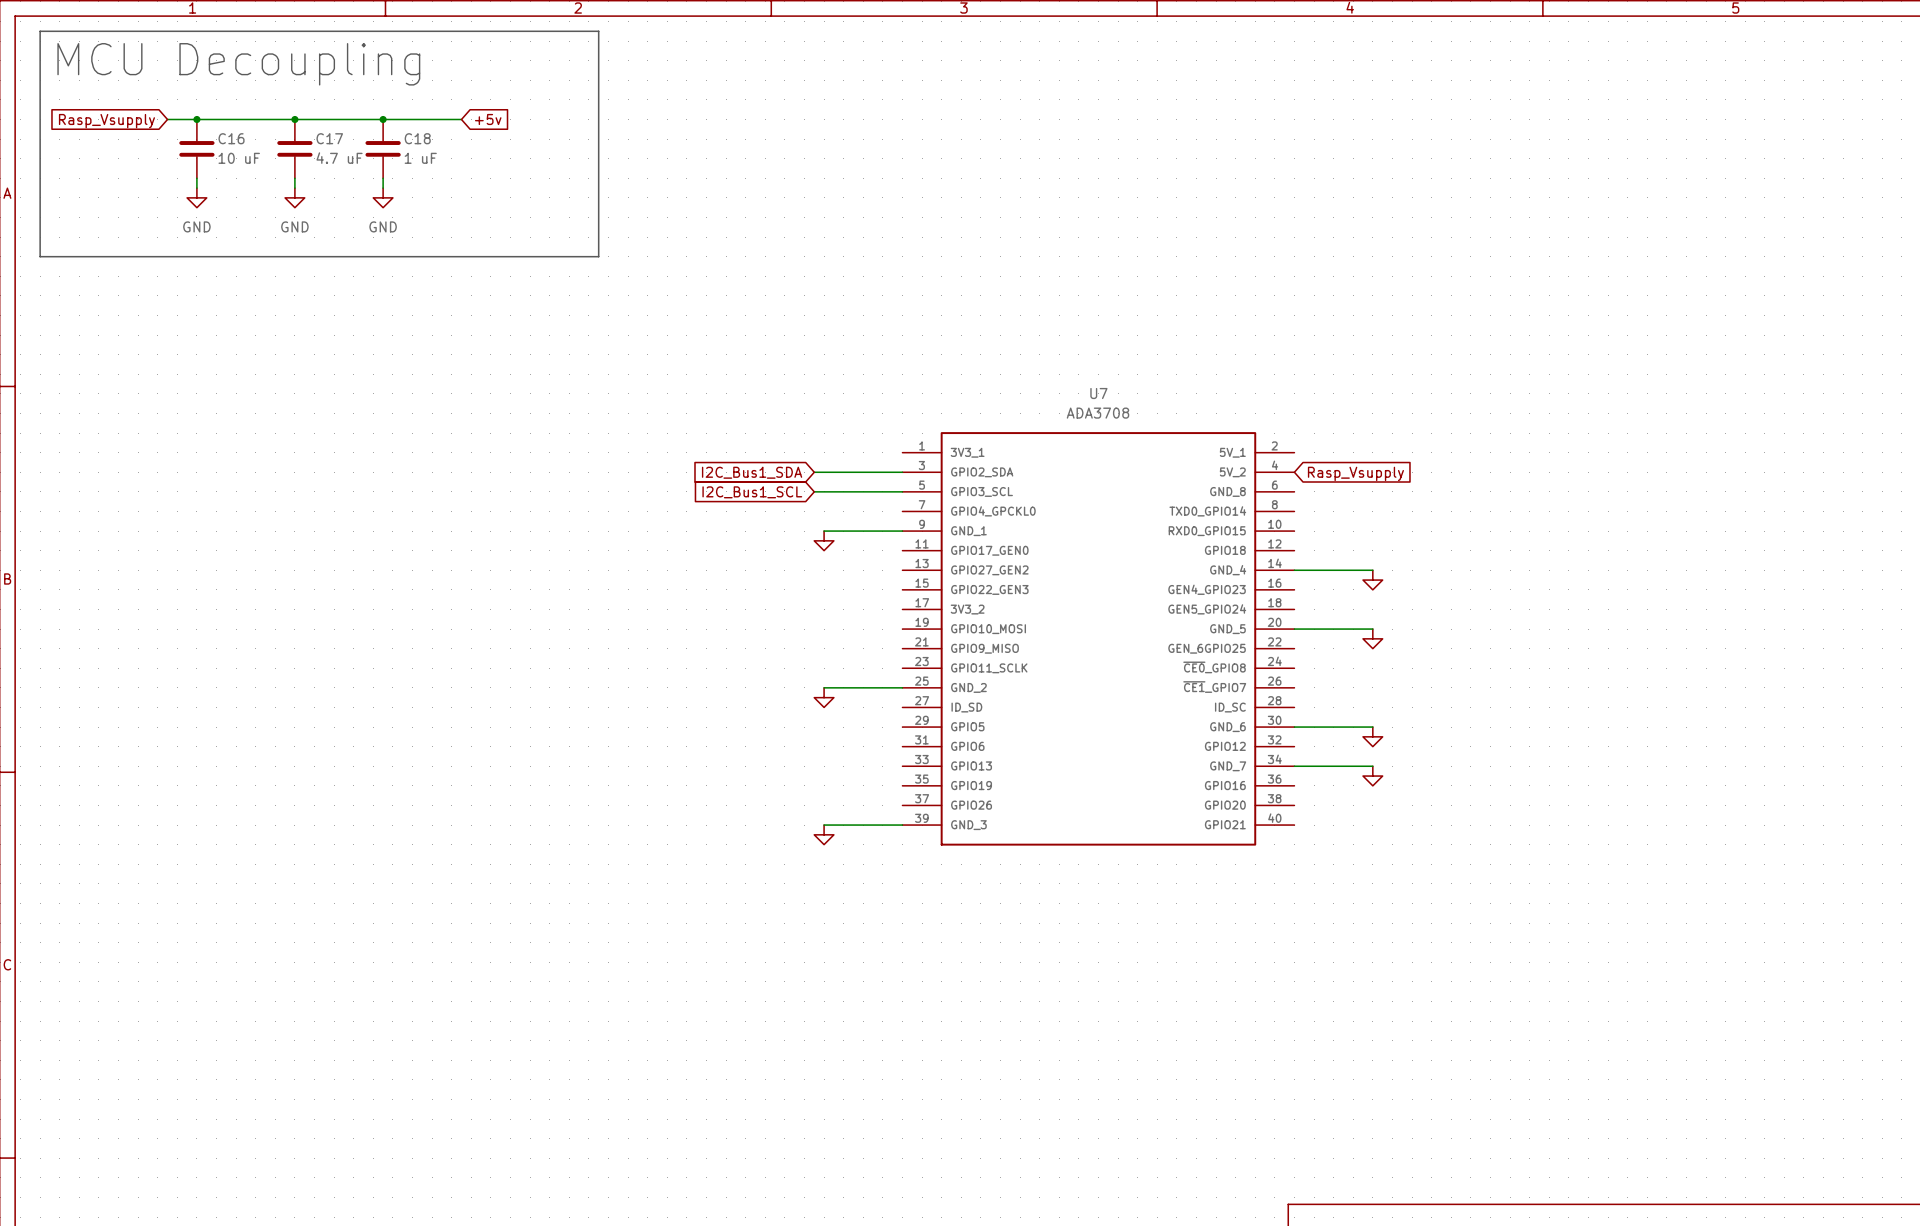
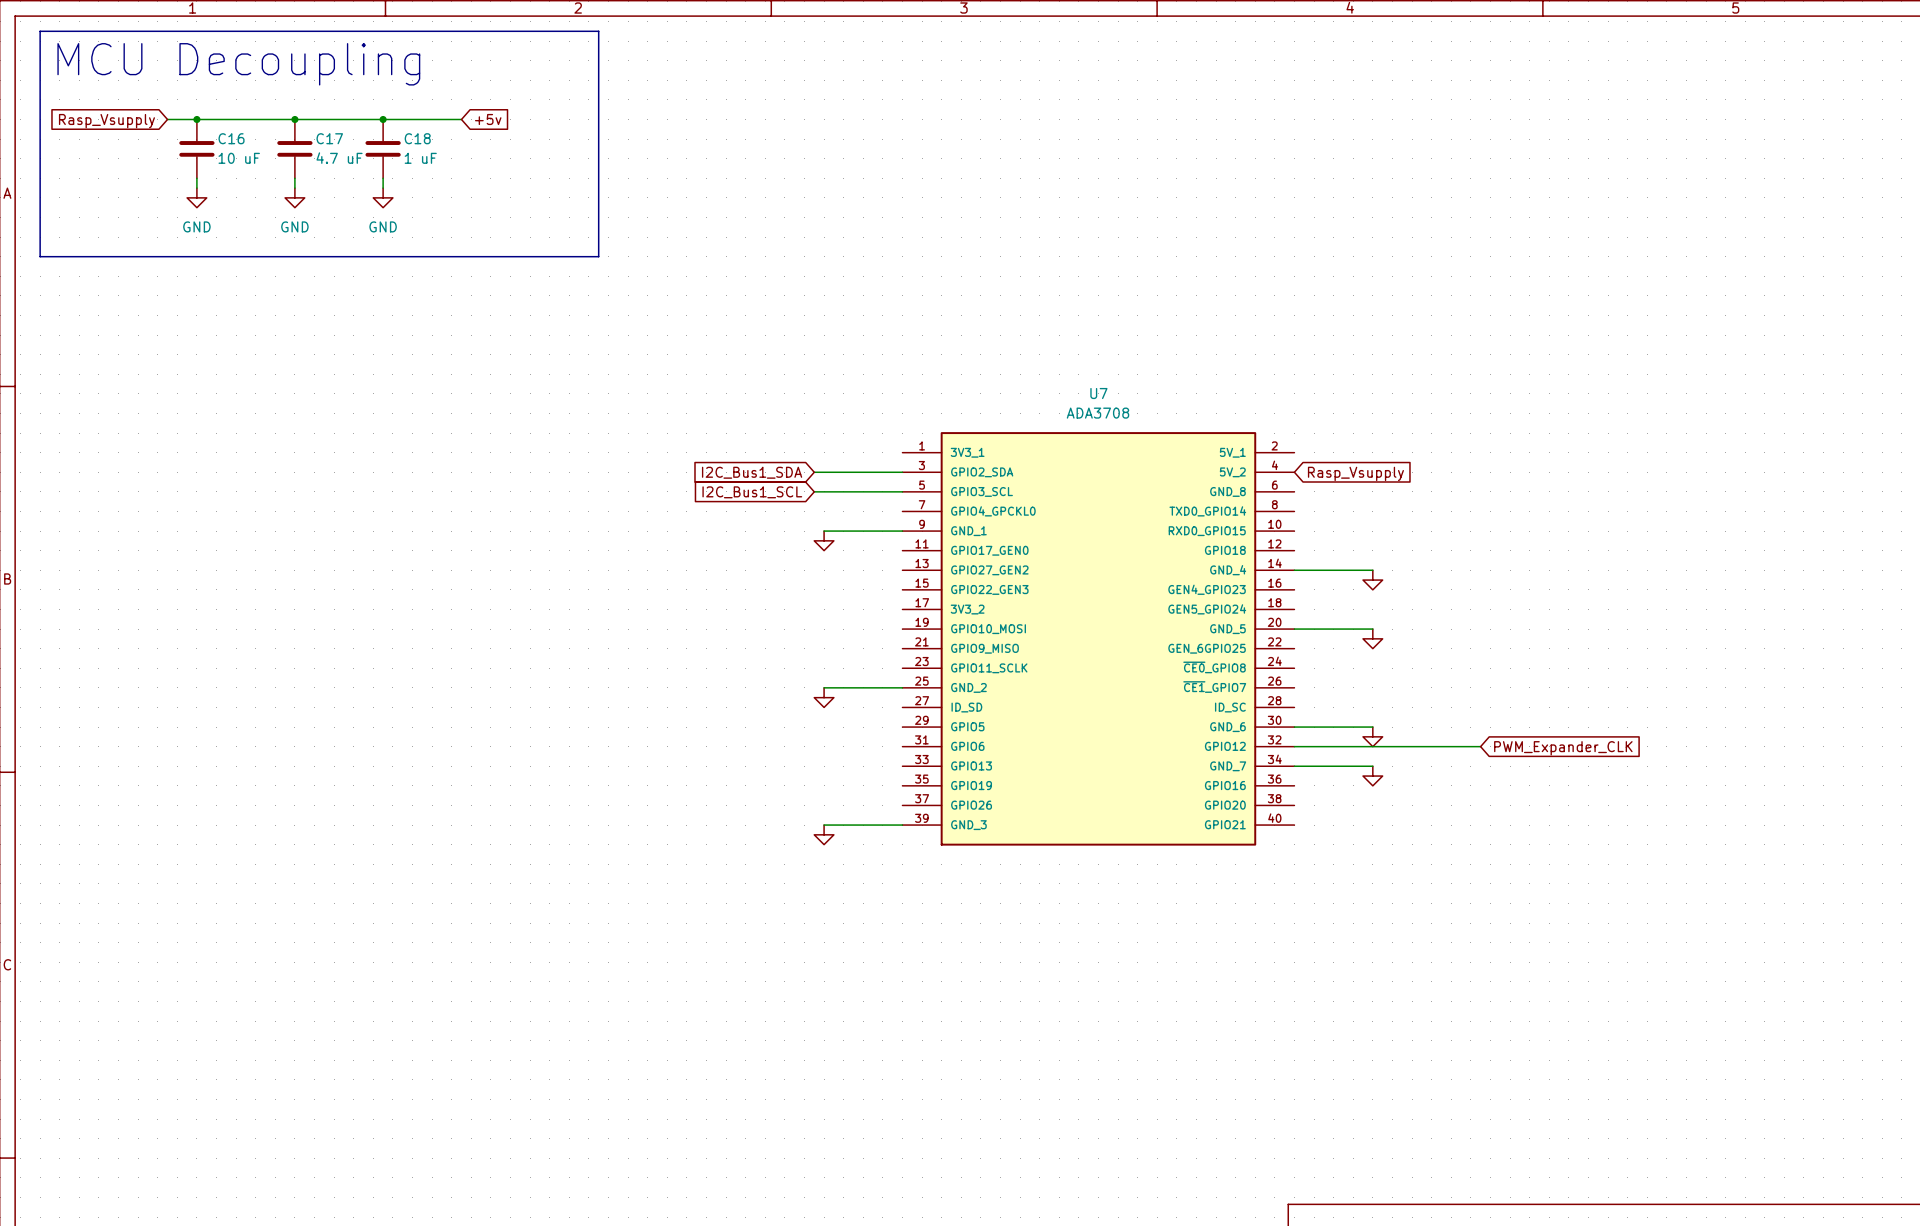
wire: none -> (1294, 746) (1480, 746)
global label: none -> PWM_Expander_CLK (1563, 748)

